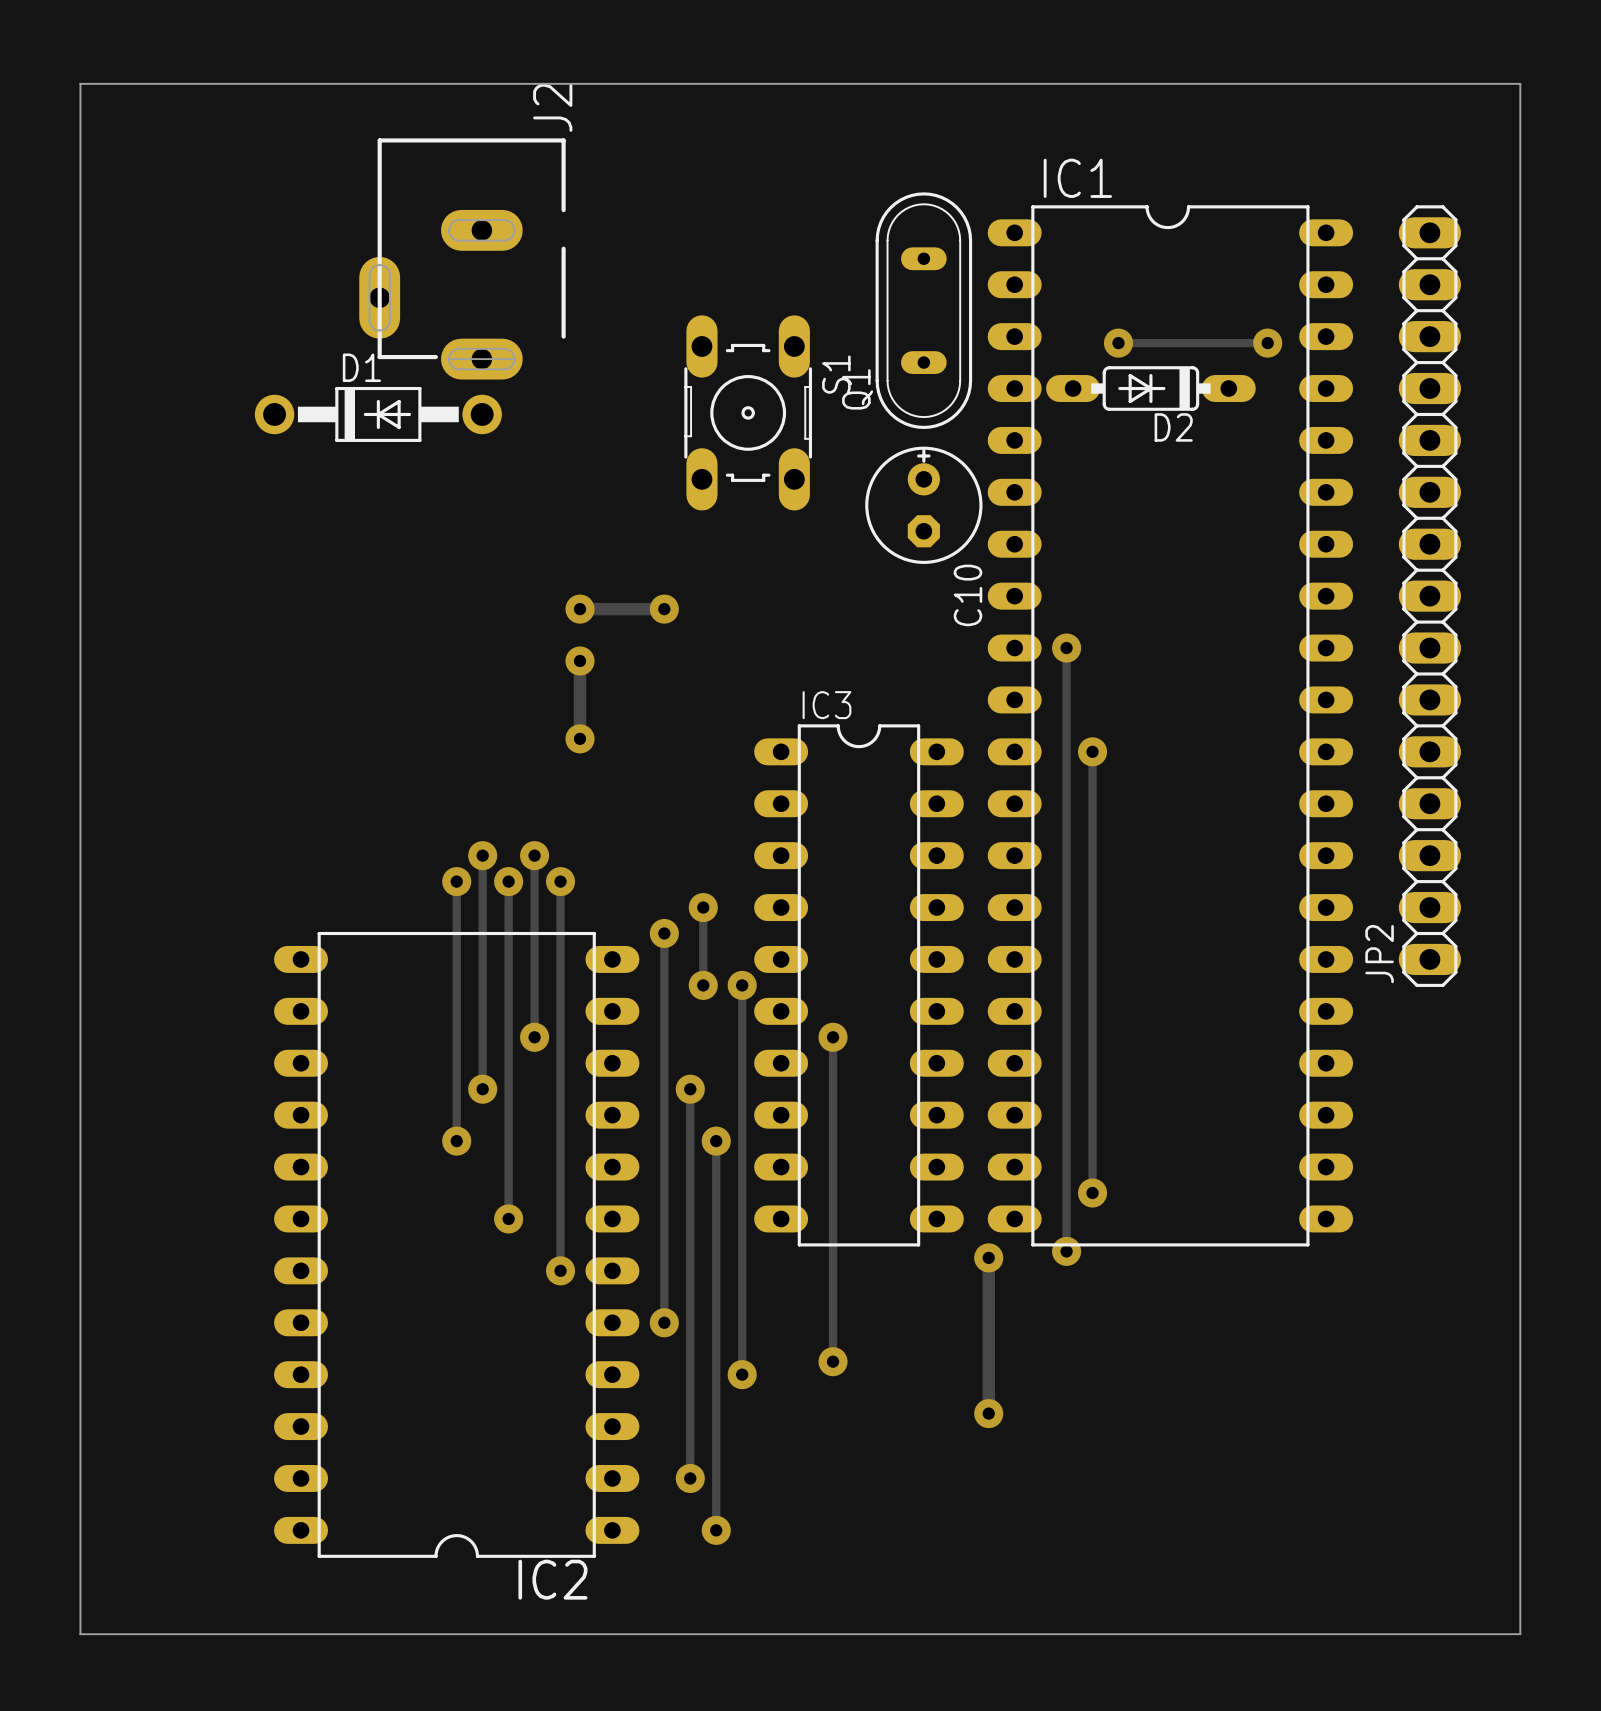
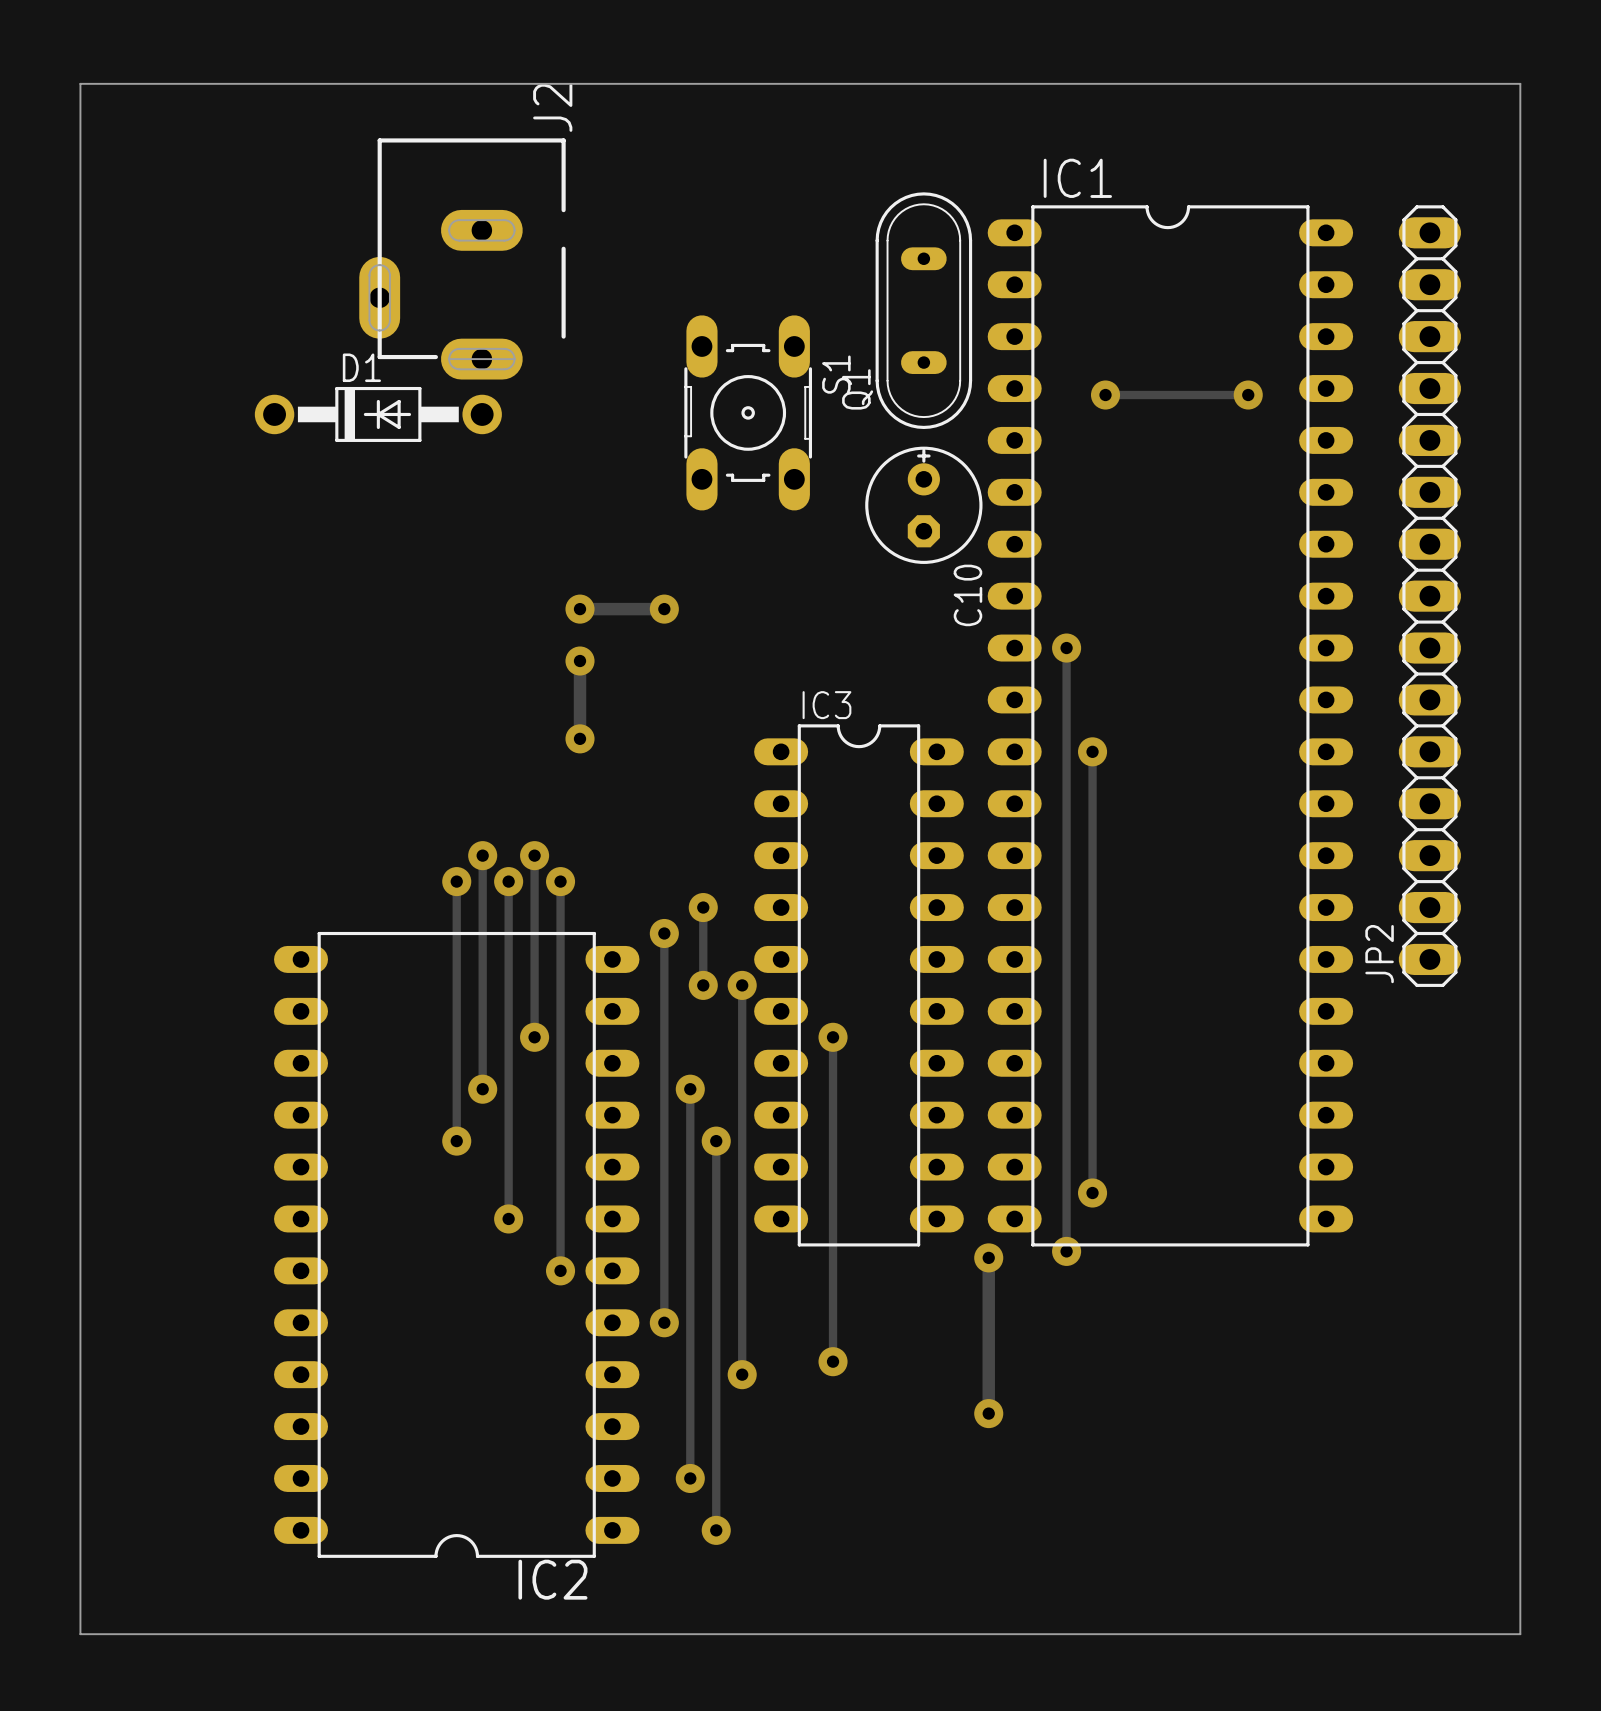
track: (1118, 343) (1267, 343) -> none
via position: (1118, 343) -> (1105, 395)
via position: (1267, 343) -> (1248, 395)
D2: (1150, 388) -> none
track: none -> (1105, 395) (1248, 395)

